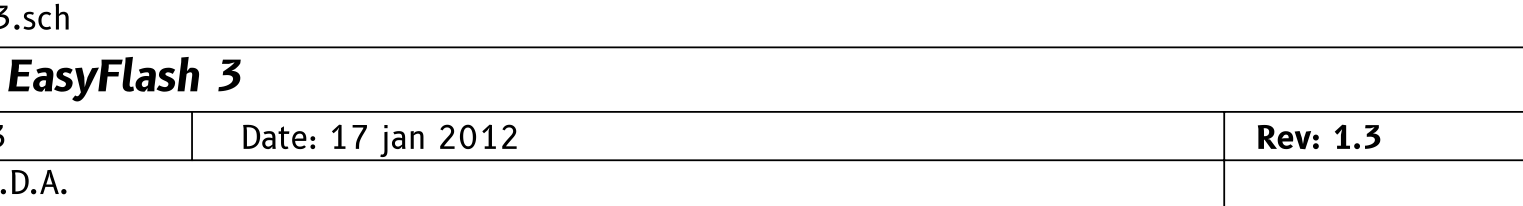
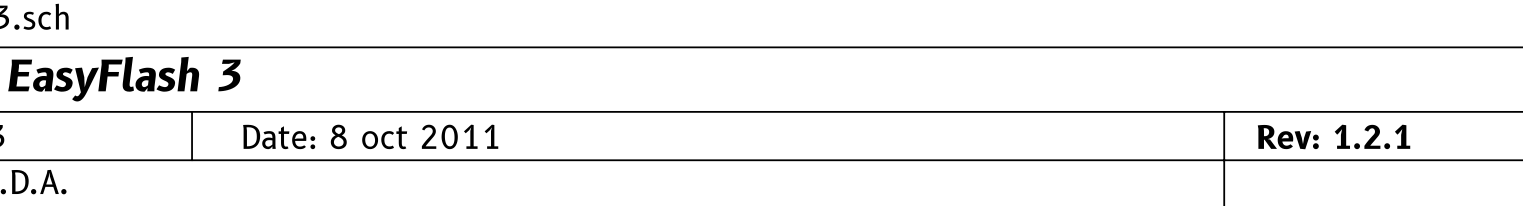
title block: Rev: 1.3 (1319, 136) -> Rev: 1.2.1 (1334, 136)
title block: Date: 17 jan 2012 (379, 140) -> Date: 8 oct 2011 (370, 136)

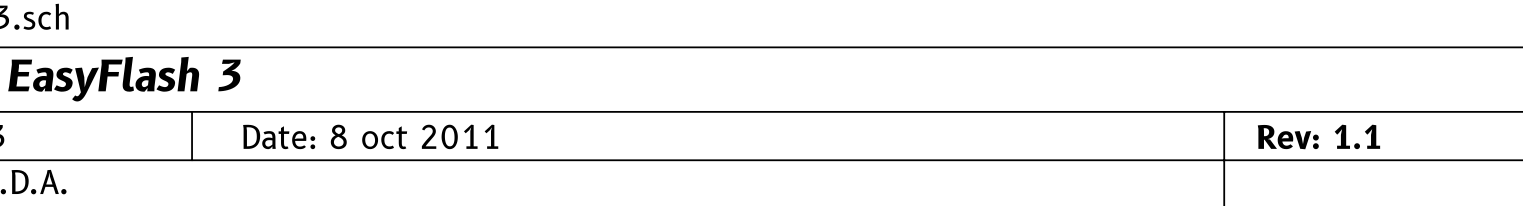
title block: Rev: 1.2.1 (1334, 136) -> Rev: 1.1 (1318, 136)

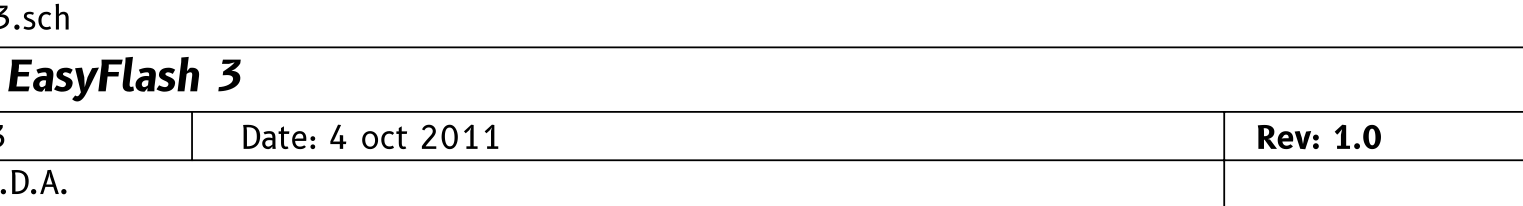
title block: Date: 8 oct 2011 (370, 136) -> Date: 4 oct 2011 (370, 136)
title block: Rev: 1.1 (1318, 136) -> Rev: 1.0 (1319, 136)

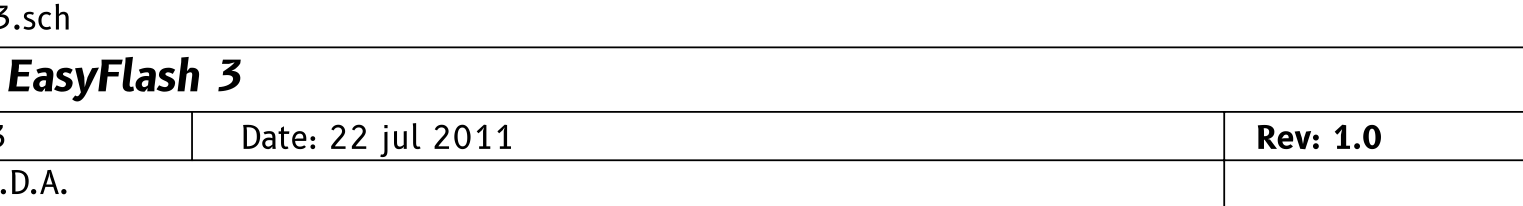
title block: Date: 4 oct 2011 (370, 136) -> Date: 22 jul 2011 (377, 140)

